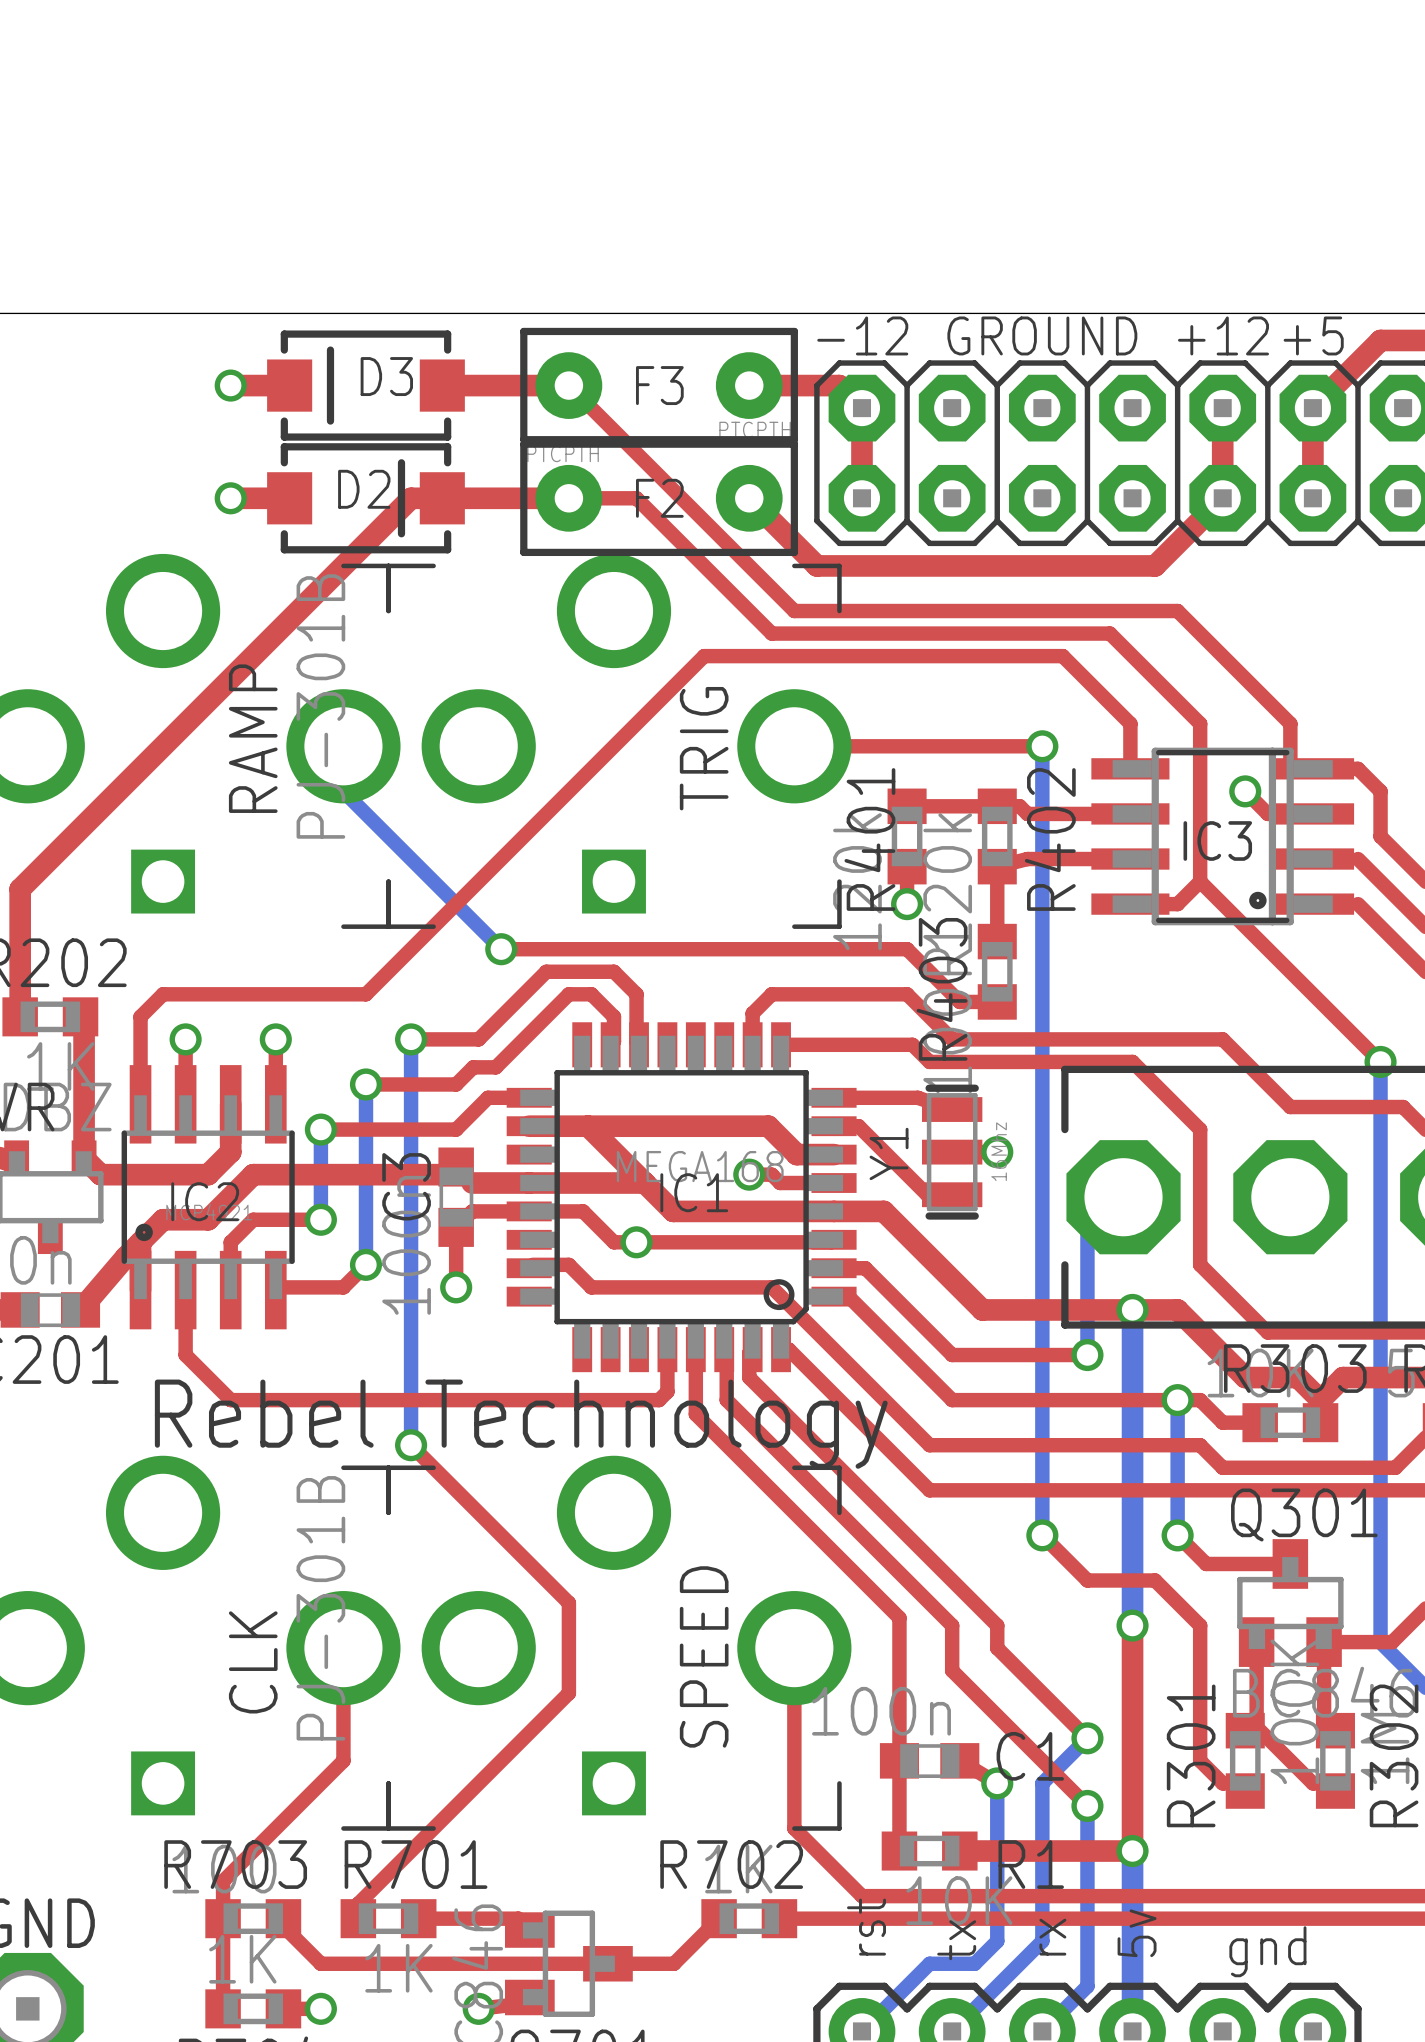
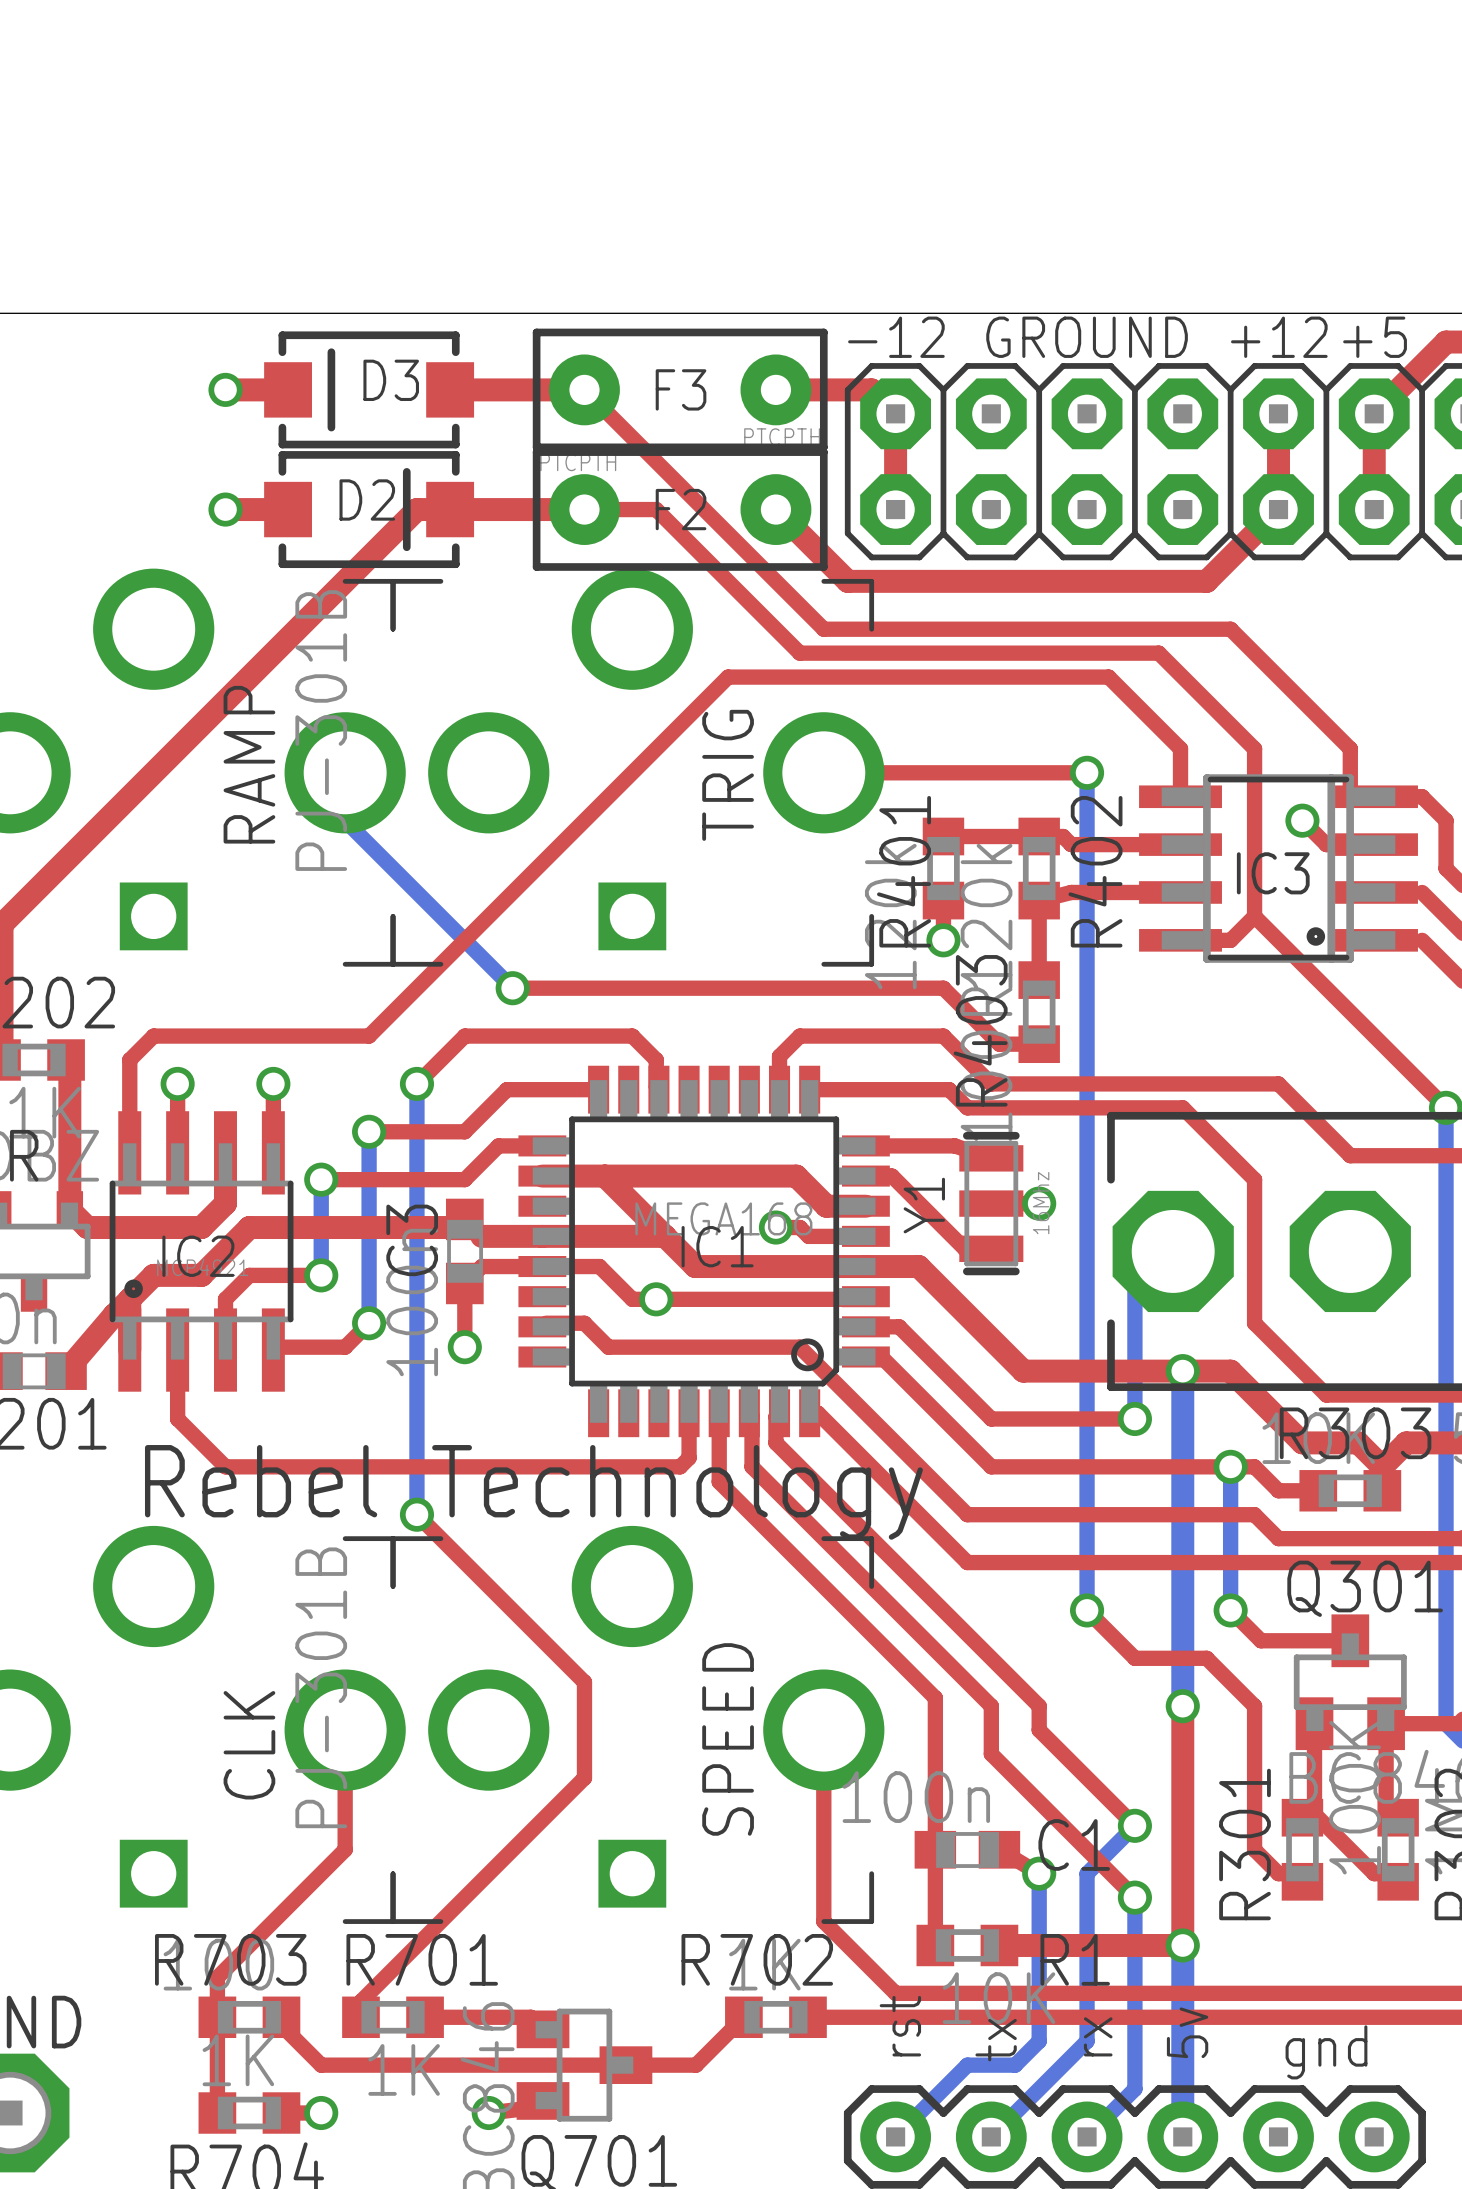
top track: (568, 994) (495, 1067) (473, 1067) -> (598, 1089) (506, 1089) (483, 1113)
top track: (591, 994) (613, 1016) (613, 1041) (610, 1044) -> (608, 1036) (632, 1036) (656, 1059)
top track: (636, 1016) (636, 994) (613, 971) (546, 971) (478, 1039) (411, 1039) -> (584, 1036) (464, 1036) (416, 1083)

